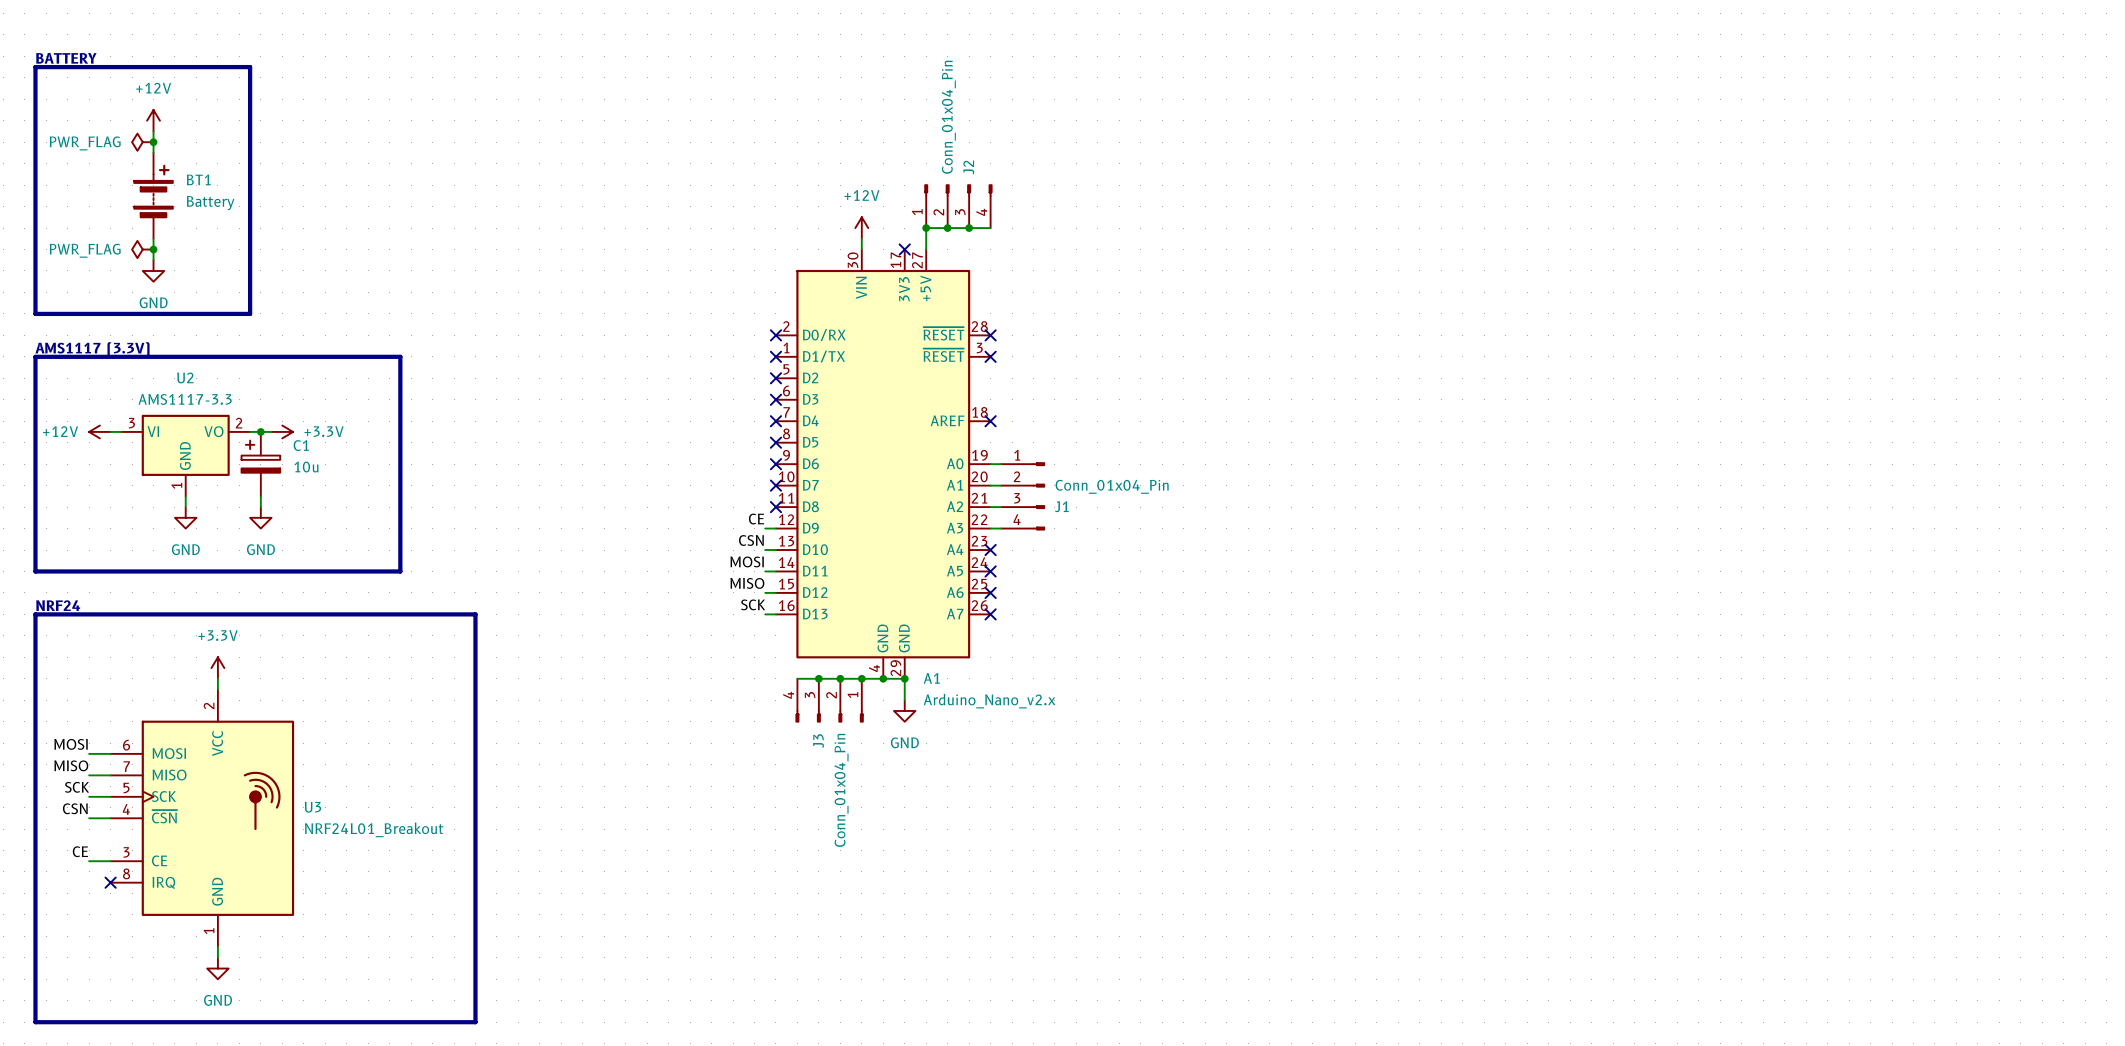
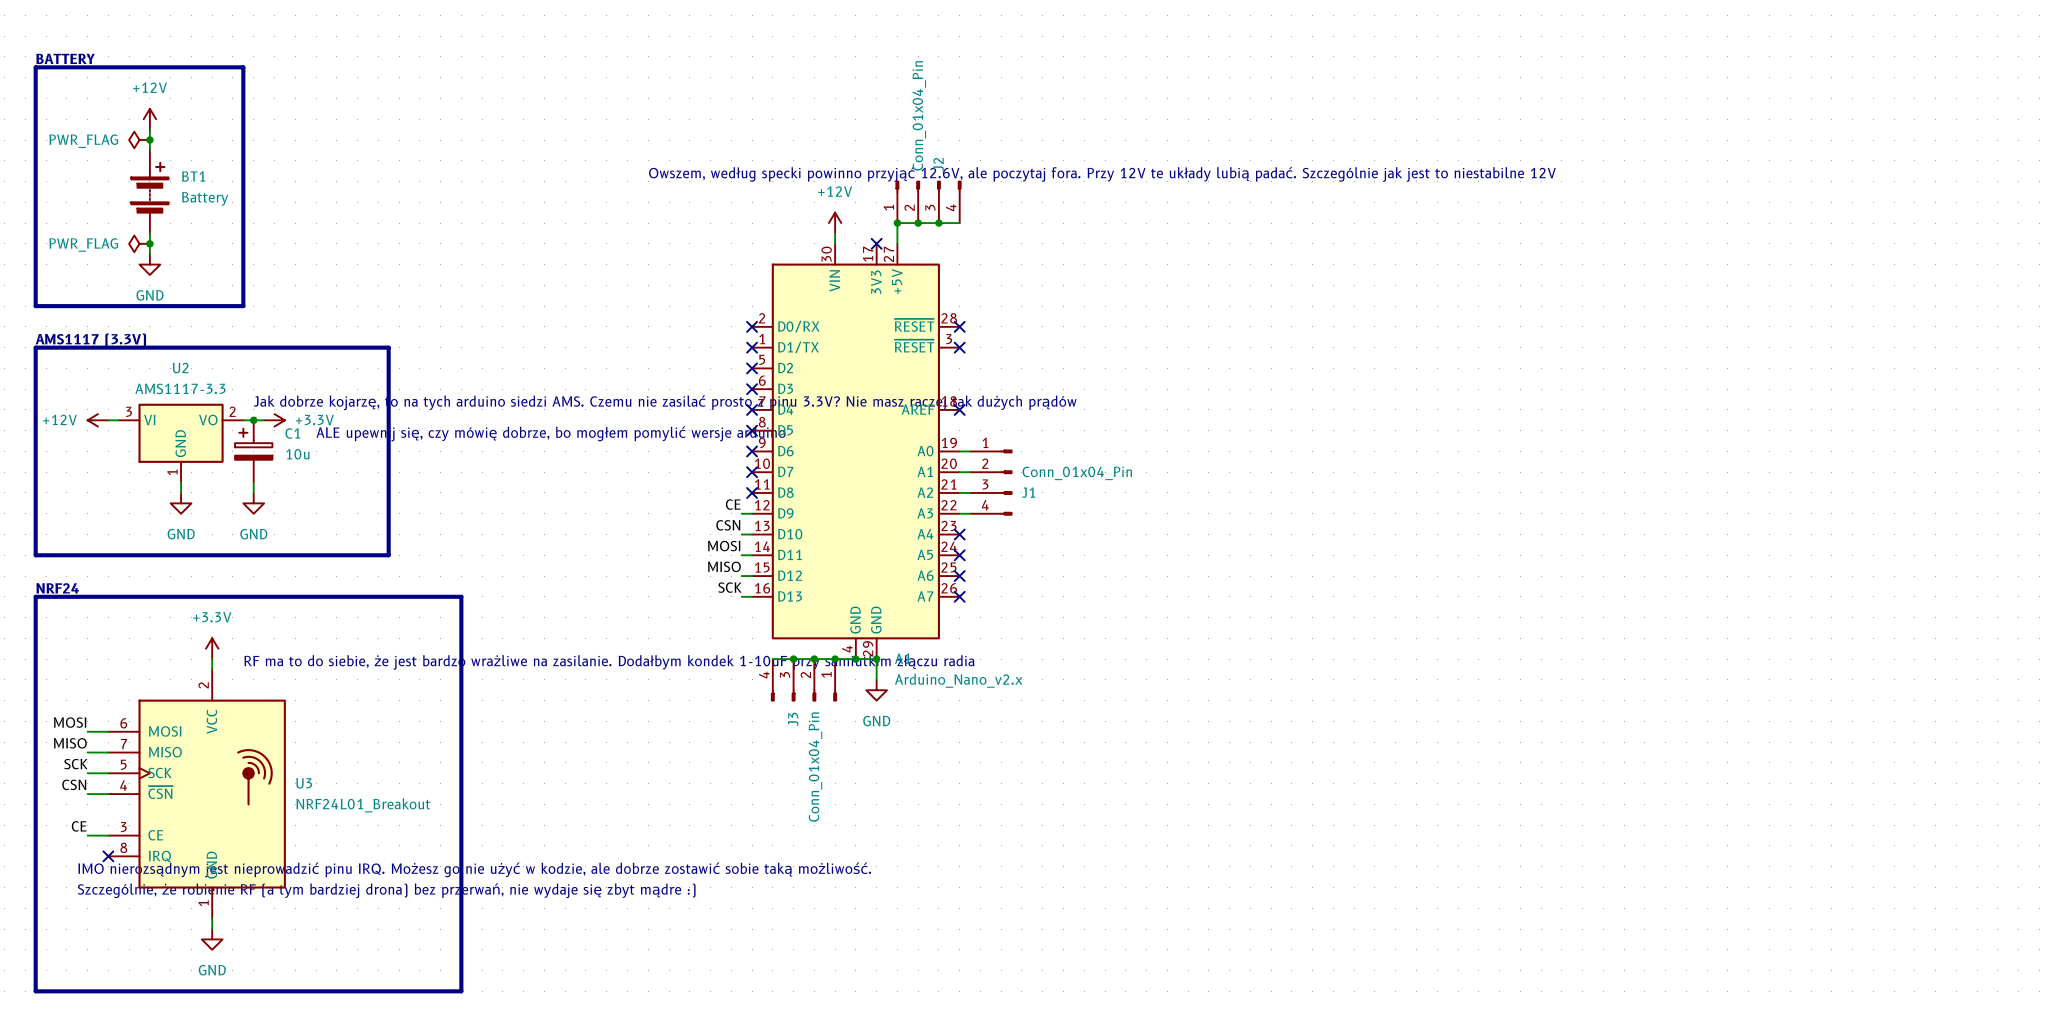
text: none -> Owszem, według specki powinno przyjąć 12.6V, ale poczytaj fora. Przy 12V te układy lubią padać. Szczególnie jak jest to niestabilne 12V (1102, 174)
text: none -> Jak dobrze kojarzę, to na tych arduino siedzi AMS. Czemu nie zasilać prosto z pinu 3.3V? Nie masz raczej tak dużych prądów (665, 402)
text: none -> ALE upewnij się, czy mówię dobrze, bo mogłem pomylić wersje arduino (551, 433)
text: none -> RF ma to do siebie, że jest bardzo wrażliwe na zasilanie. Dodałbym kondek 1-10uF przy samiutkim złączu radia (609, 662)
text: none -> IMO nierozsądnym jest nieprowadzić pinu IRQ. Możesz go nie użyć w kodzie, ale dobrze zostawić sobie taką możliwość. (474, 869)
text: none -> Szczególnie, że robienie RF (a tym bardziej drona) bez przerwań, nie wydaje się zbyt mądre :) (386, 890)

